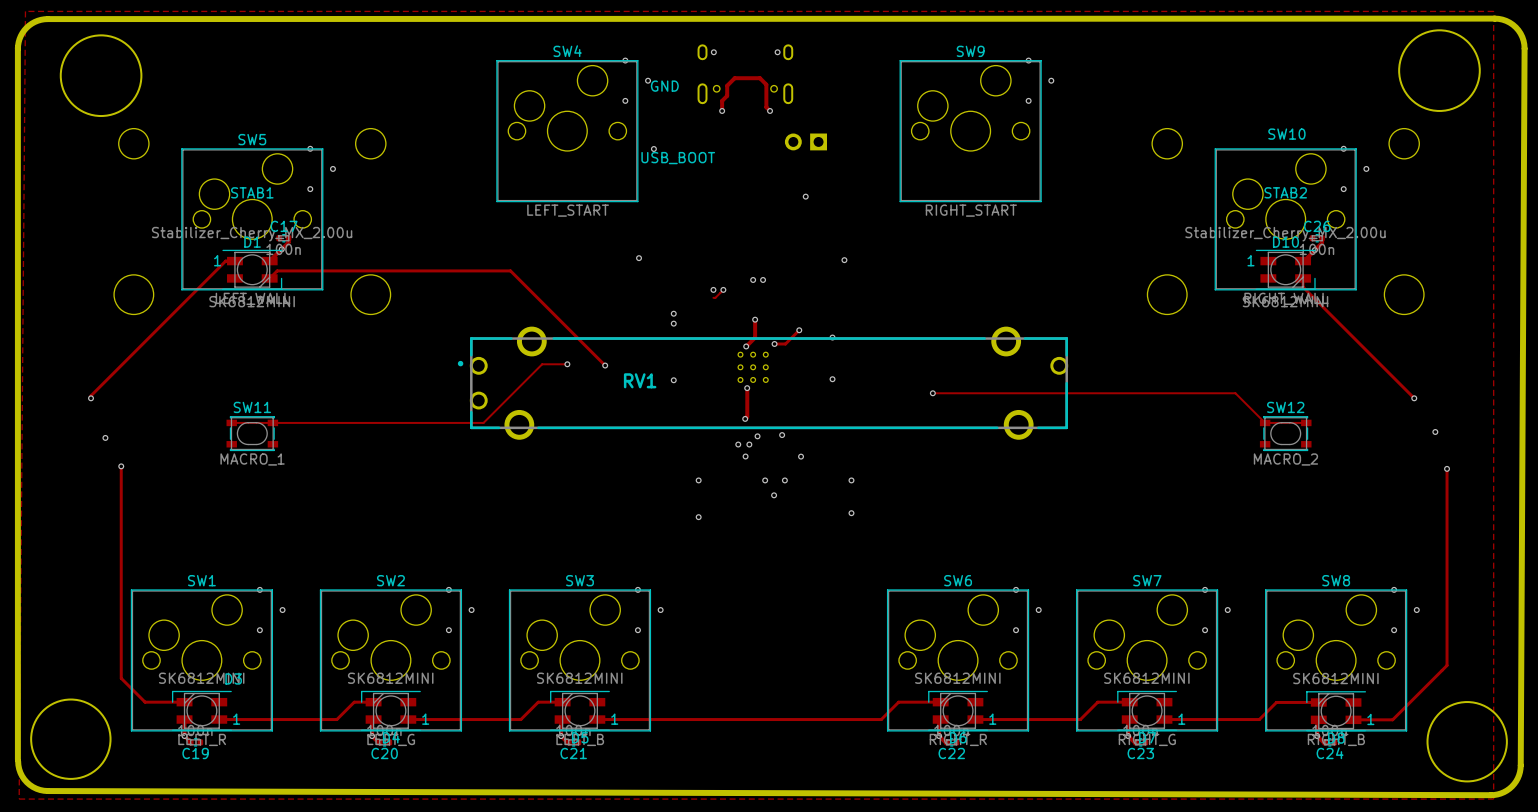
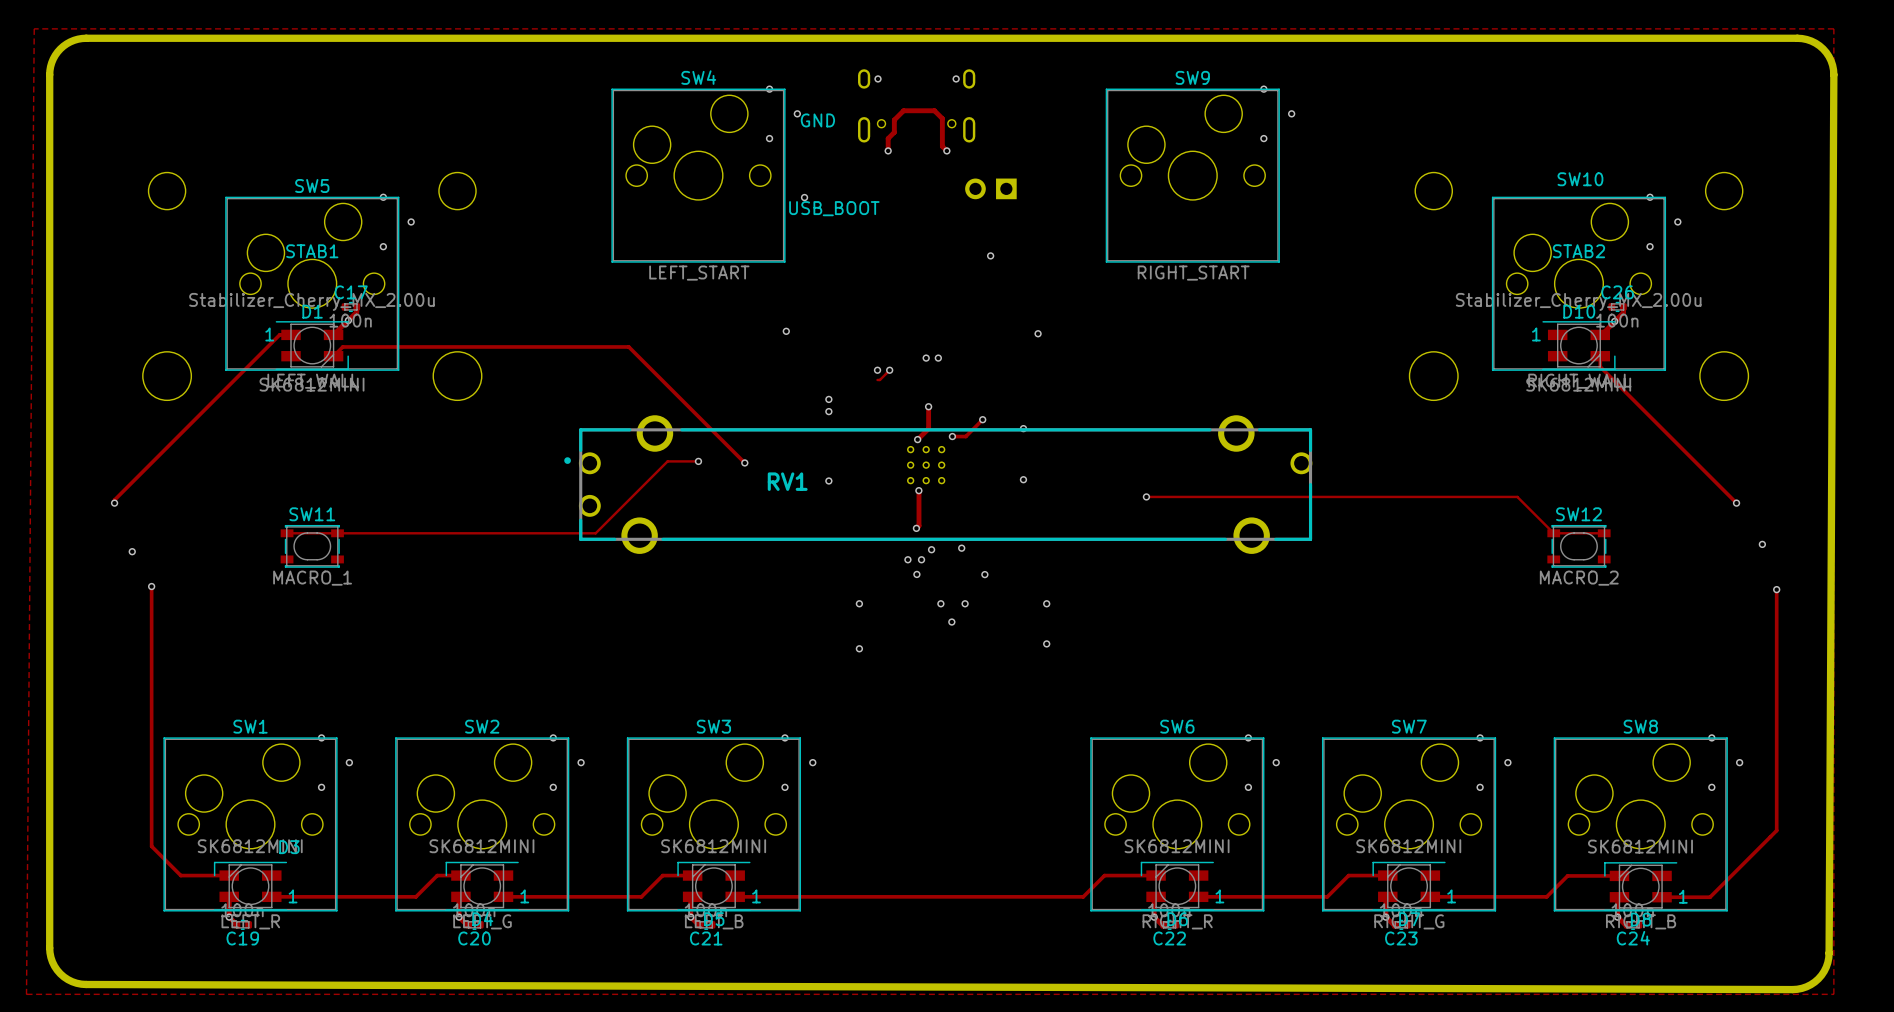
board edge: none -> (86, 38) (1797, 38) (1815, 43) (1828, 56) (1833, 74) (1829, 953) (1824, 971) (1810, 984) (1792, 989) (86, 984) (67, 979) (54, 966) (49, 948) (49, 74) (53, 58) (60, 48) (74, 40) (86, 38)
round board edge: [1398, 29, 1481, 112] -> none
round board edge: [59, 34, 143, 118] -> none
board edge: (17, 47) (17, 759) -> none
board edge: (1524, 48) (1522, 36) (1515, 27) (1506, 20) (1494, 18) (47, 19) (37, 20) (26, 27) (19, 39) (17, 48) -> none
board edge: (1524, 48) (1520, 765) (1516, 781) (1503, 792) (1490, 795) (47, 791) (36, 788) (26, 782) (20, 772) (18, 761) -> none
round board edge: [30, 698, 112, 780] -> none
round board edge: [1426, 701, 1508, 783] -> none

